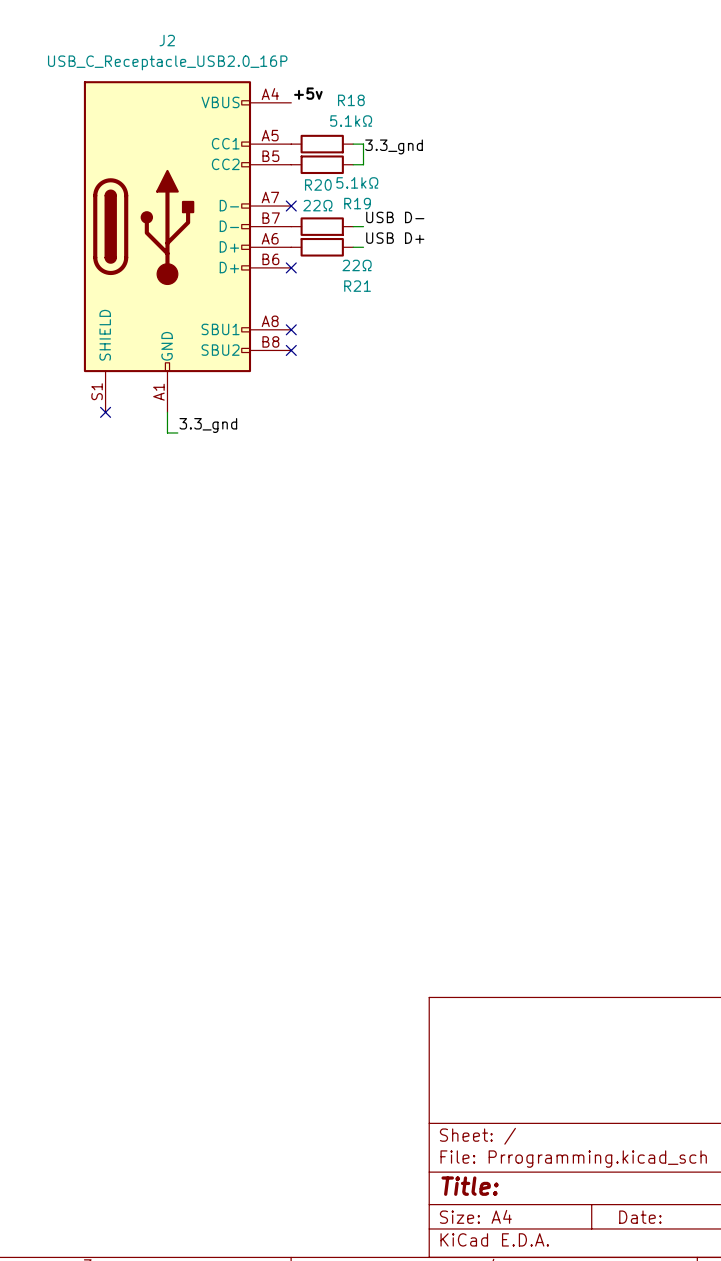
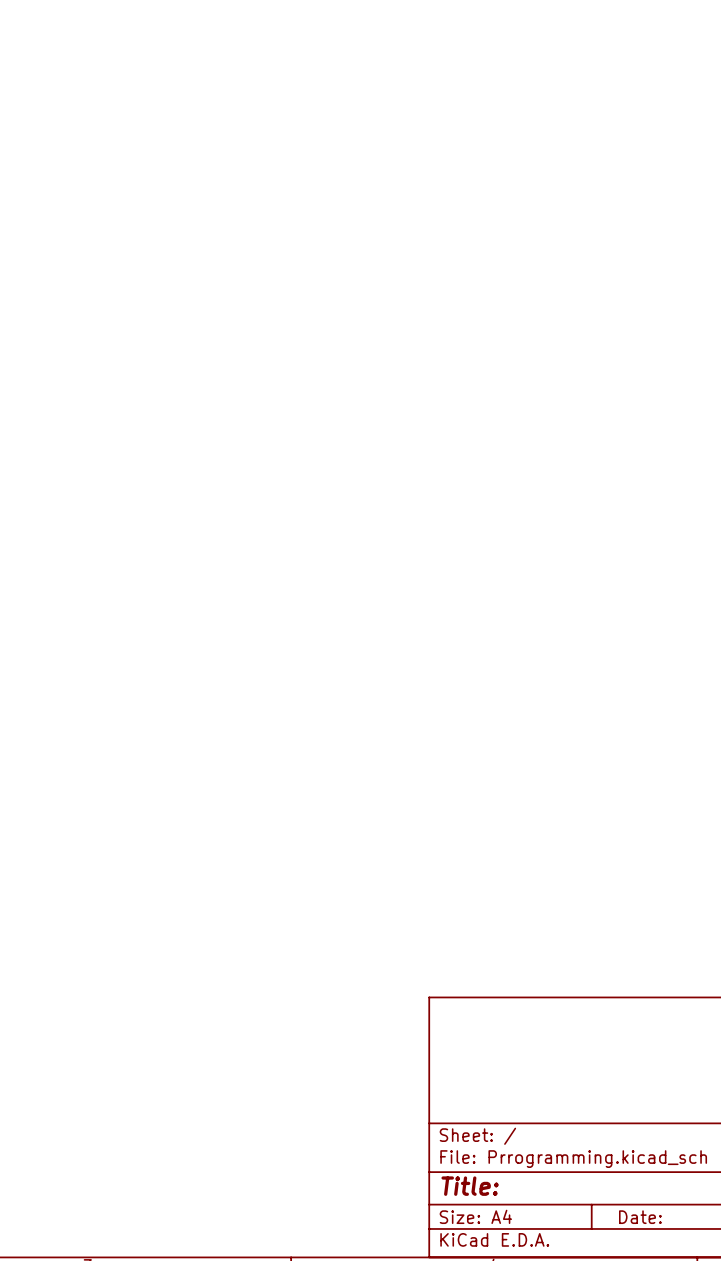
label: +5v (308, 93) -> none
R18: 5.1kΩ (322, 144) -> none
wire: (353, 144) (363, 144) (363, 164) (353, 164) -> none
label: 3.3_gnd (394, 146) -> none
R19: 5.1kΩ (322, 164) -> none
no-connect mark: (291, 206) -> none
label: USB D- (395, 217) -> none
R20: 22Ω (322, 226) -> none
wire: (353, 226) (363, 226) -> none
label: USB D+ (395, 238) -> none
J2: USB_C_Receptacle_USB2.0_16P (187, 246) -> none
R21: 22Ω (322, 247) -> none
wire: (353, 247) (363, 247) -> none
no-connect mark: (291, 267) -> none
no-connect mark: (291, 329) -> none
no-connect mark: (291, 350) -> none
no-connect mark: (105, 412) -> none
wire: (167, 412) (167, 432) (177, 432) -> none
label: 3.3_gnd (208, 425) -> none

